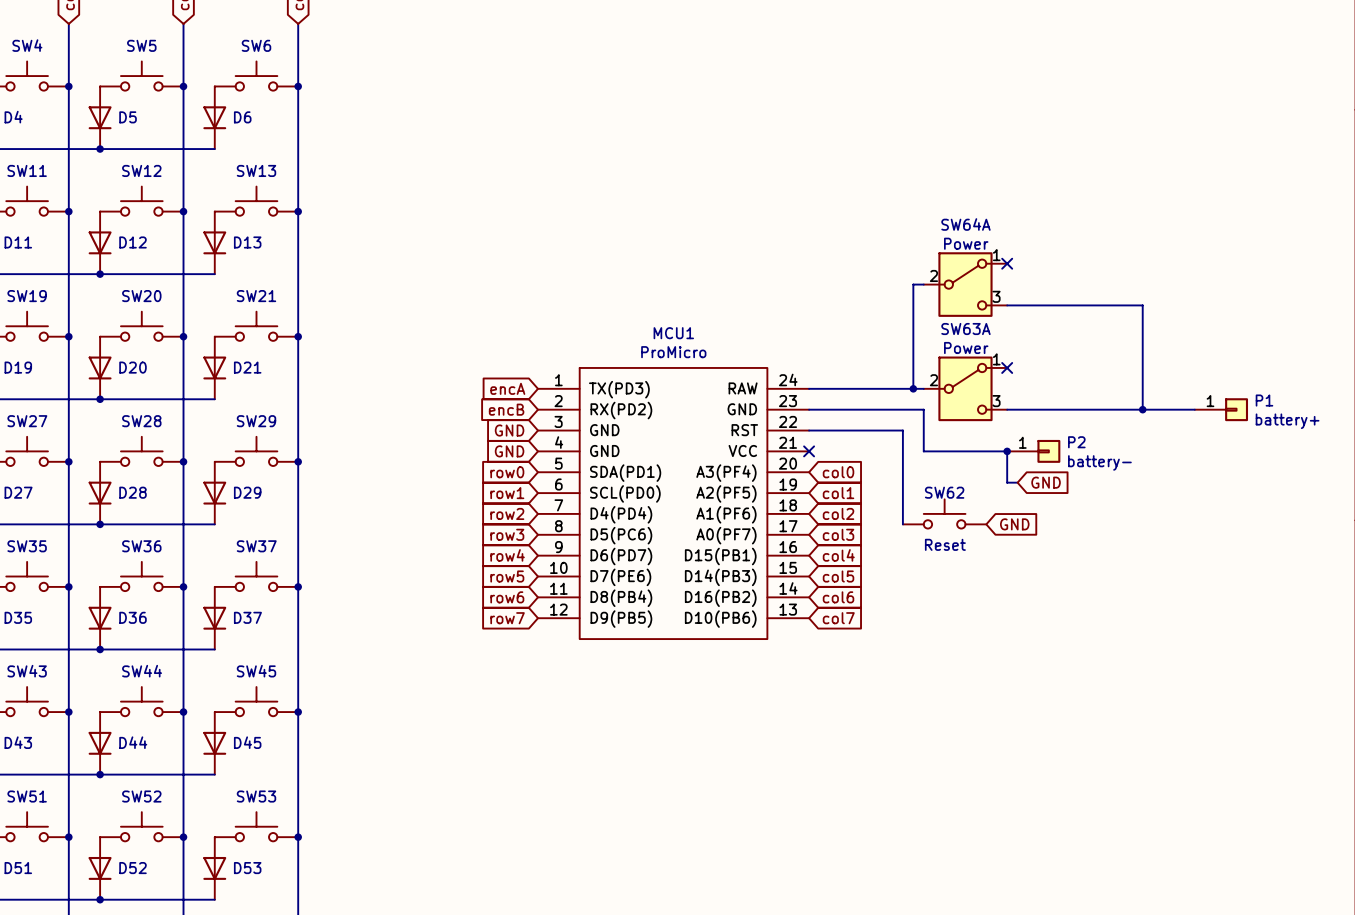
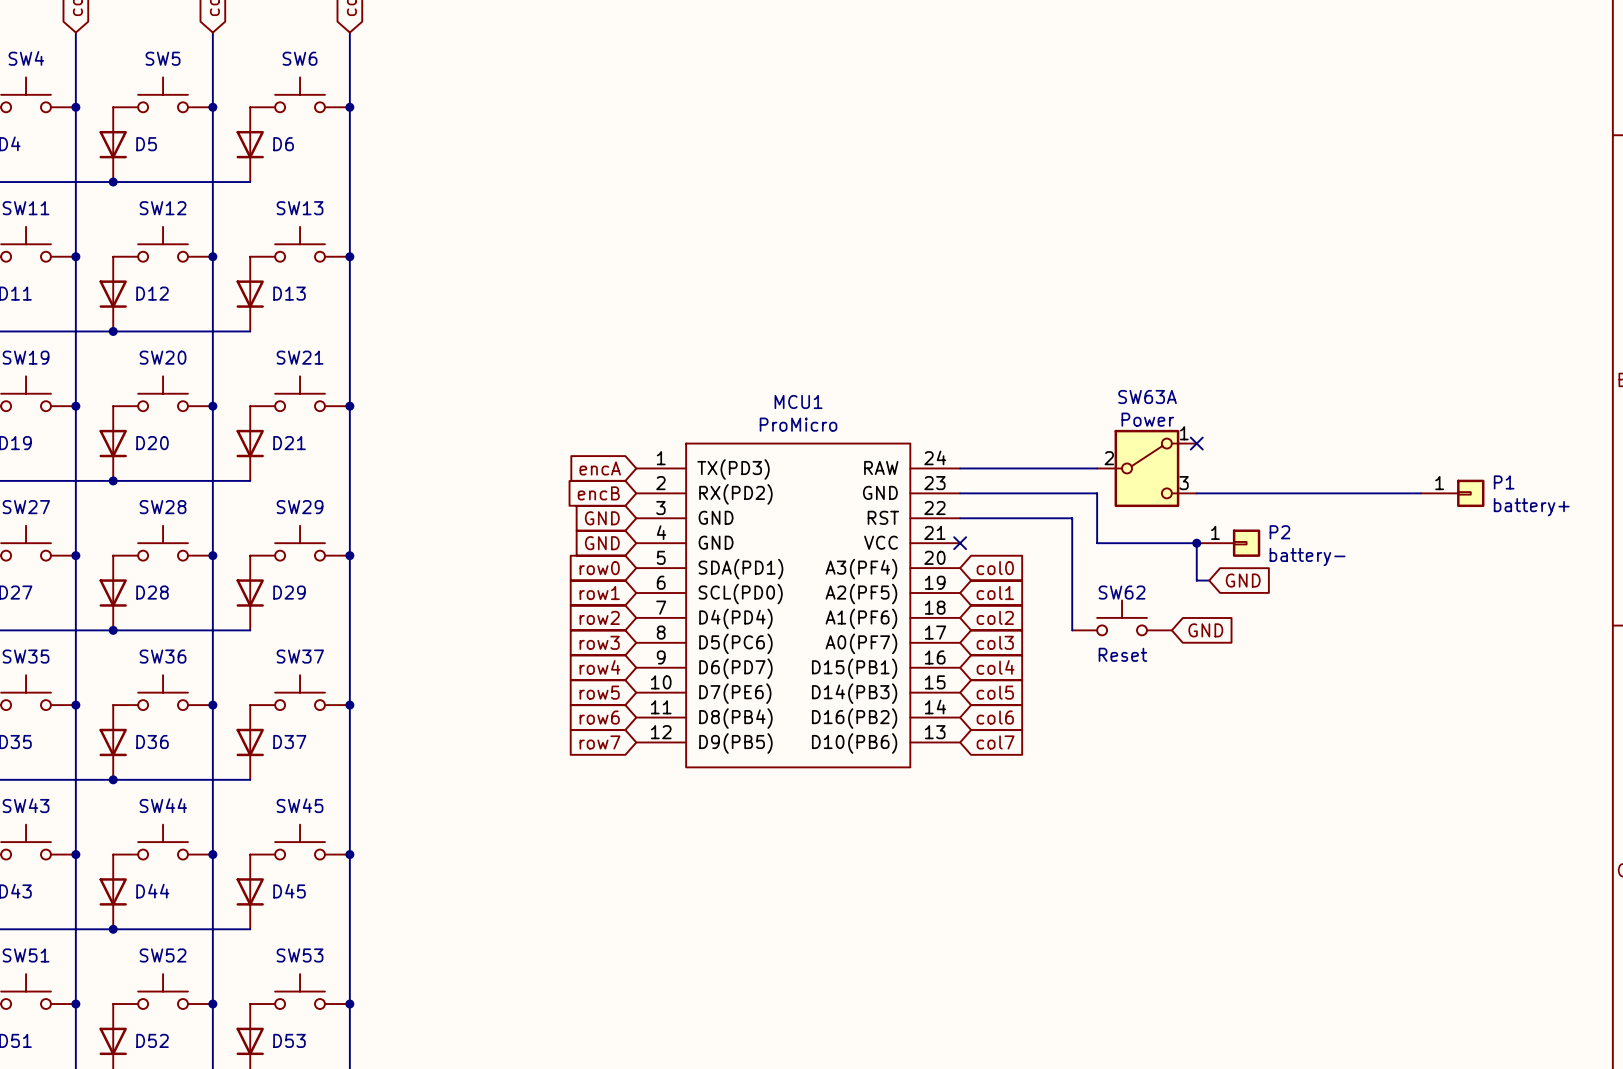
no-connect mark: (1007, 263) -> none
wire: (923, 284) (913, 284) (913, 388) -> none
SW64A: Power (965, 284) -> none
wire: (1007, 305) (1142, 305) (1142, 409) -> none
junction: (913, 388) -> none
junction: (1142, 409) -> none

